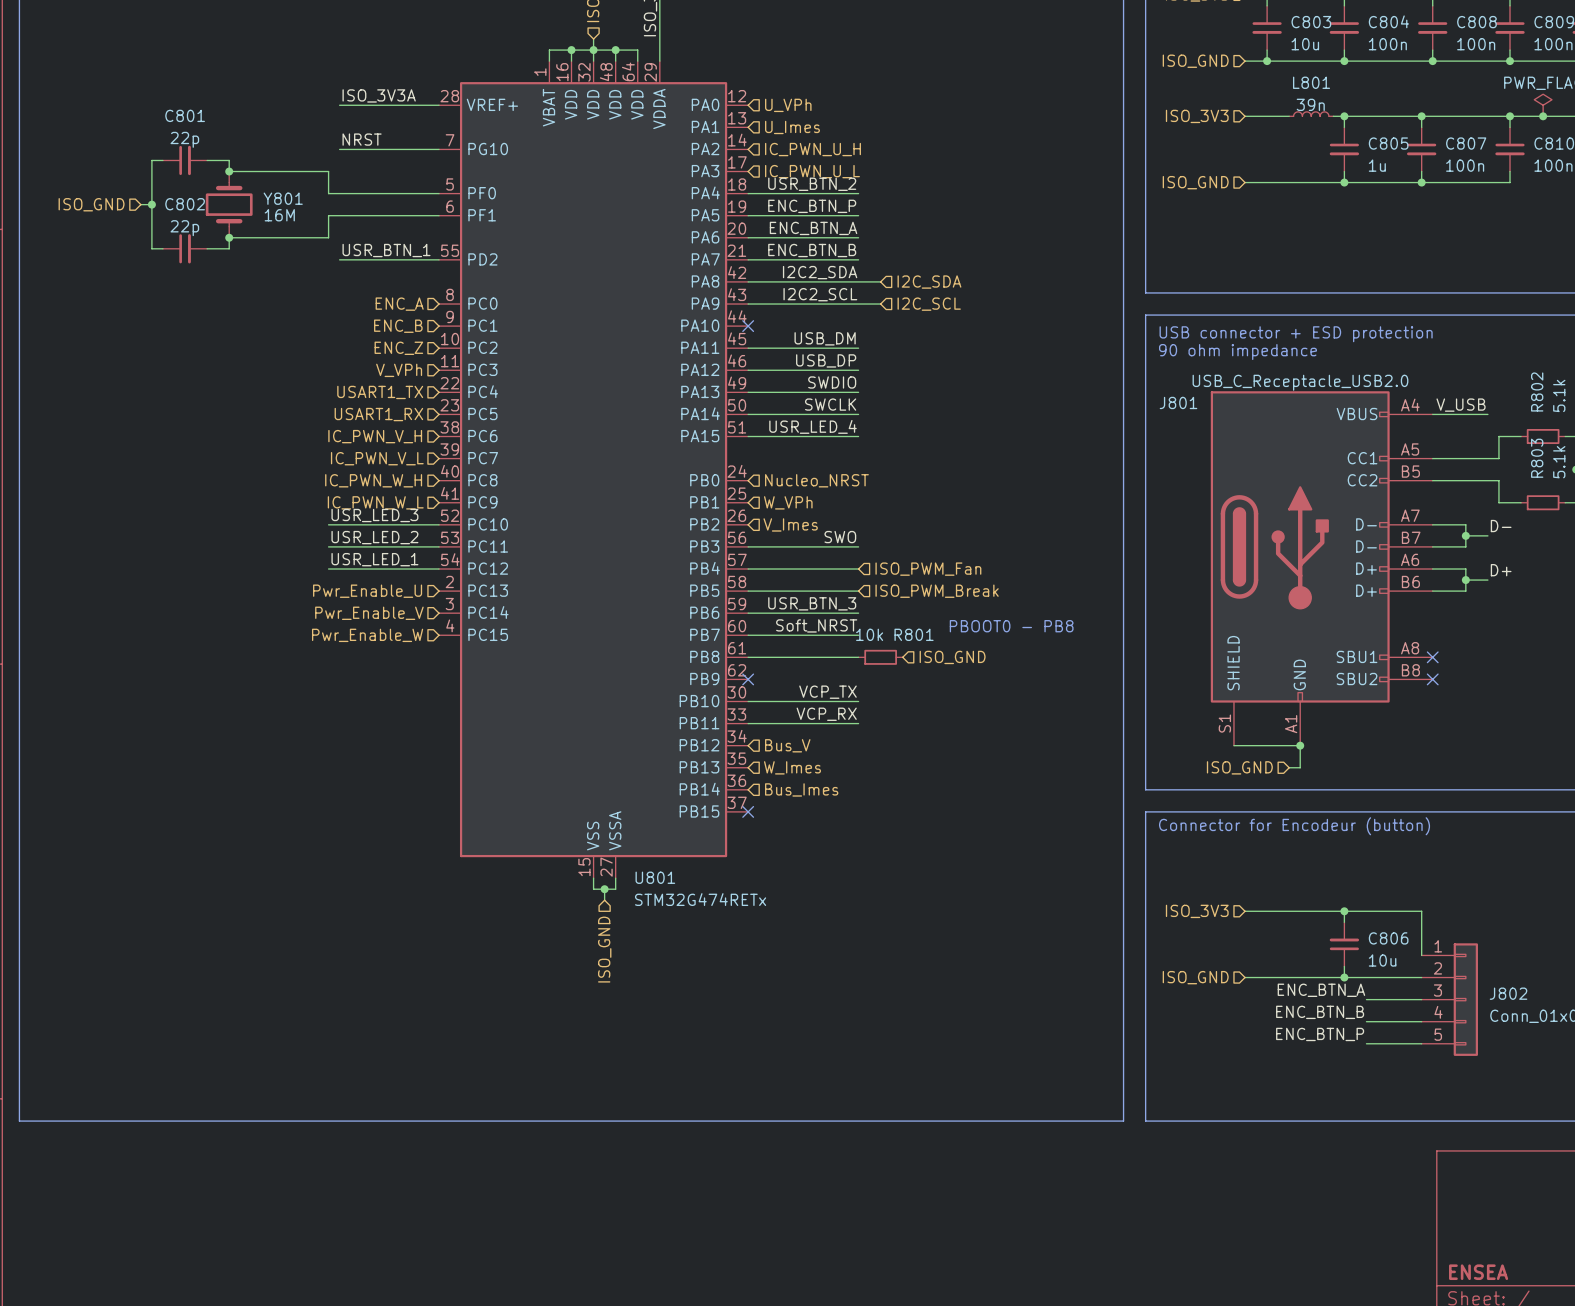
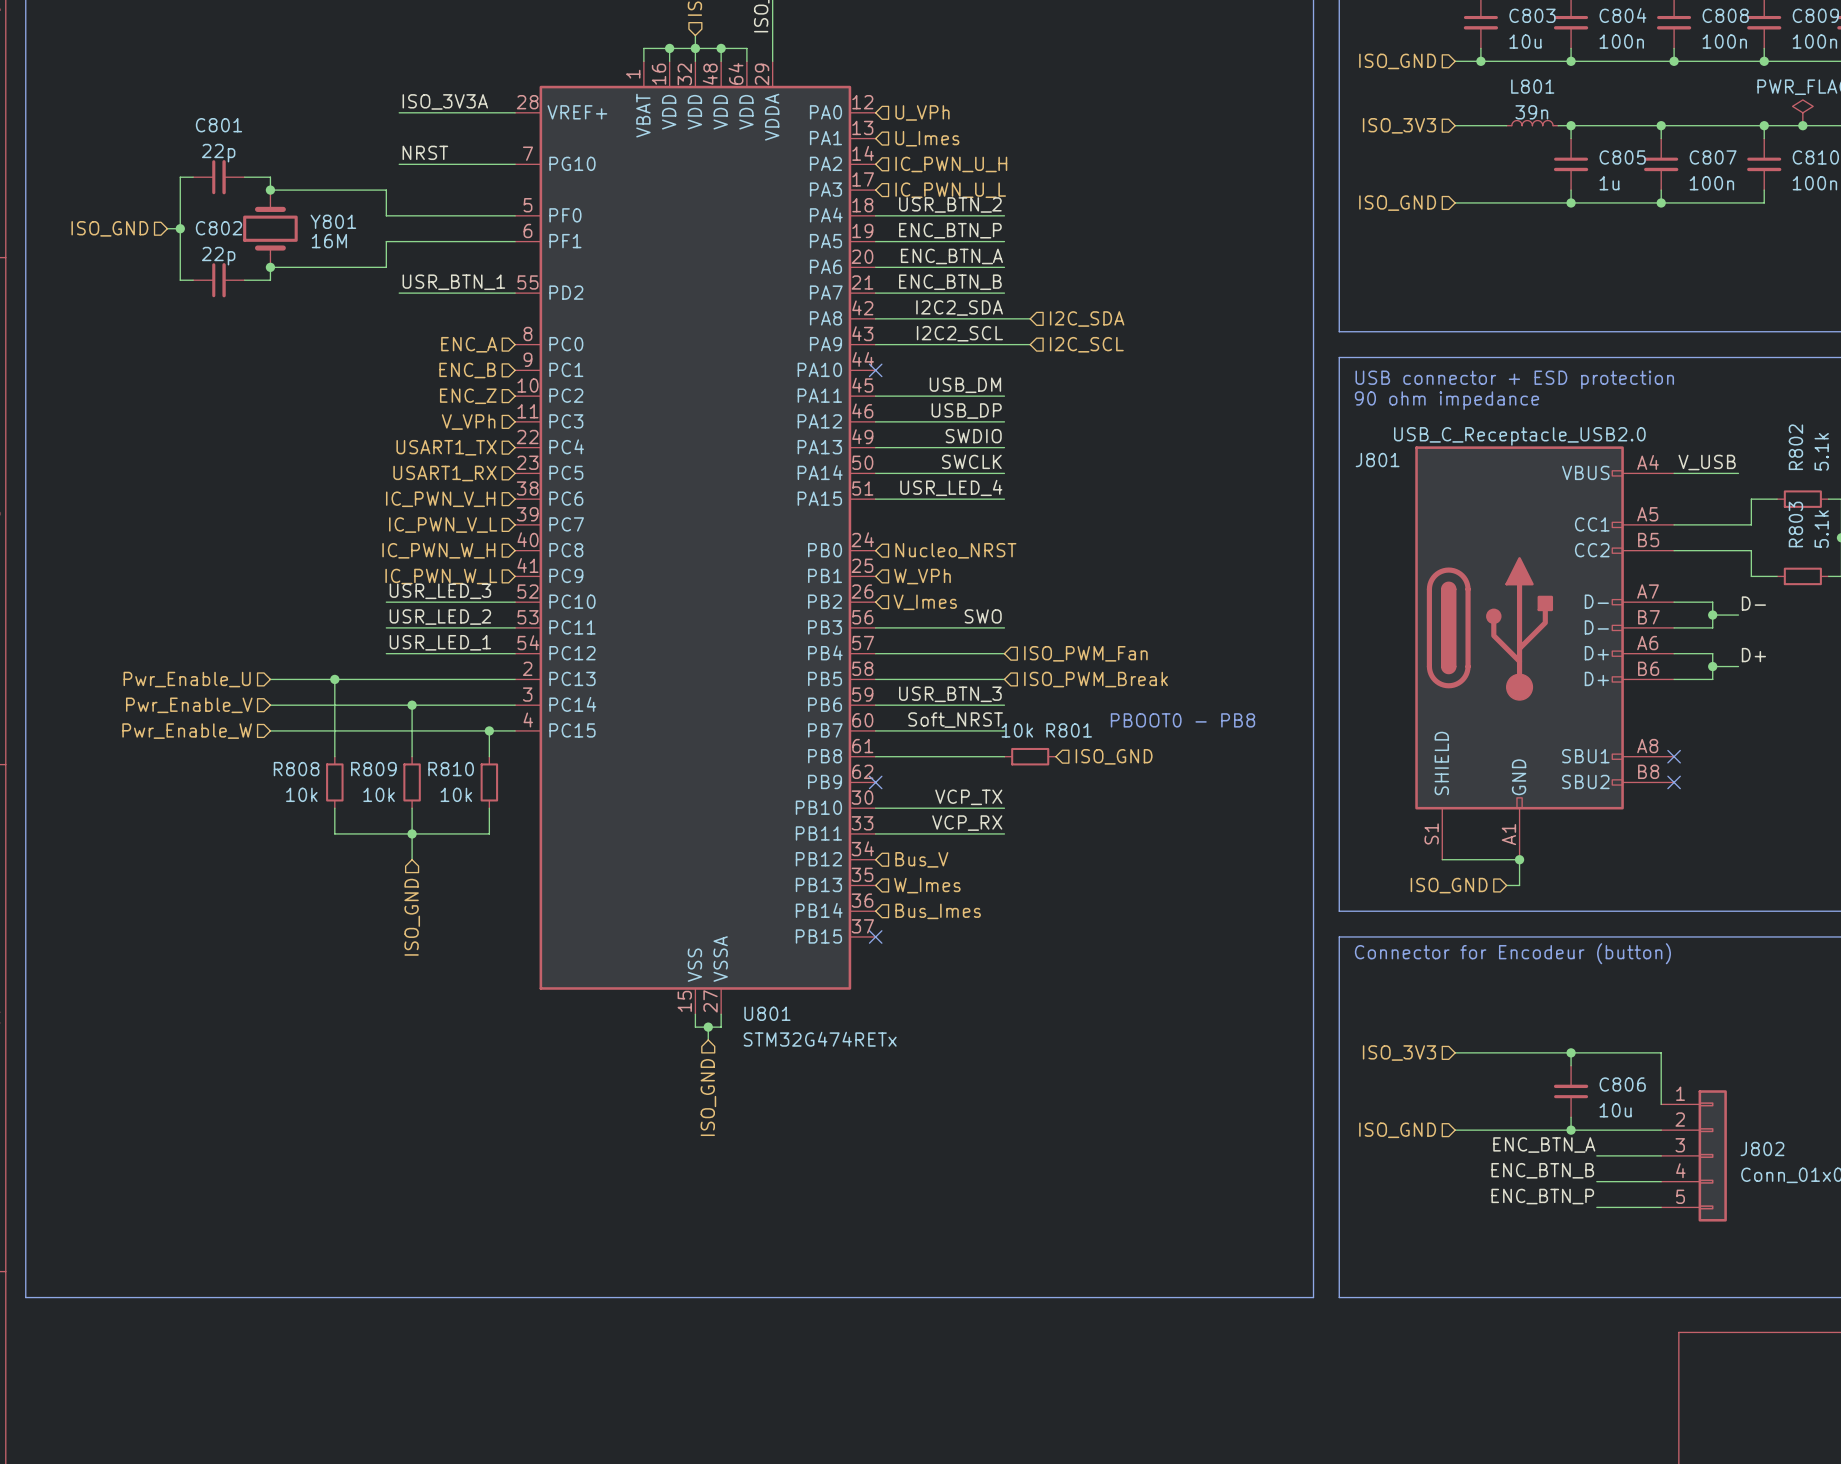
wire: none -> (270, 679) (515, 679)
wire: none -> (334, 679) (334, 756)
junction: none -> (334, 679)
hierarchical label position: Pwr_Enable_U (367, 591) -> Pwr_Enable_U (187, 679)
wire: none -> (270, 705) (515, 705)
wire: none -> (412, 705) (412, 756)
junction: none -> (412, 705)
hierarchical label position: Pwr_Enable_V (369, 613) -> Pwr_Enable_V (189, 705)
wire: none -> (270, 730) (515, 730)
hierarchical label position: Pwr_Enable_W (367, 635) -> Pwr_Enable_W (187, 731)
wire: none -> (489, 730) (489, 756)
junction: none -> (489, 730)
R808: none -> 10k (334, 782)
R809: none -> 10k (412, 782)
R810: none -> 10k (489, 782)
wire: none -> (334, 808) (334, 833) (489, 833) (489, 808)
wire: none -> (412, 808) (412, 859)
junction: none -> (412, 833)
hierarchical label: none -> ISO_GND (412, 917)

